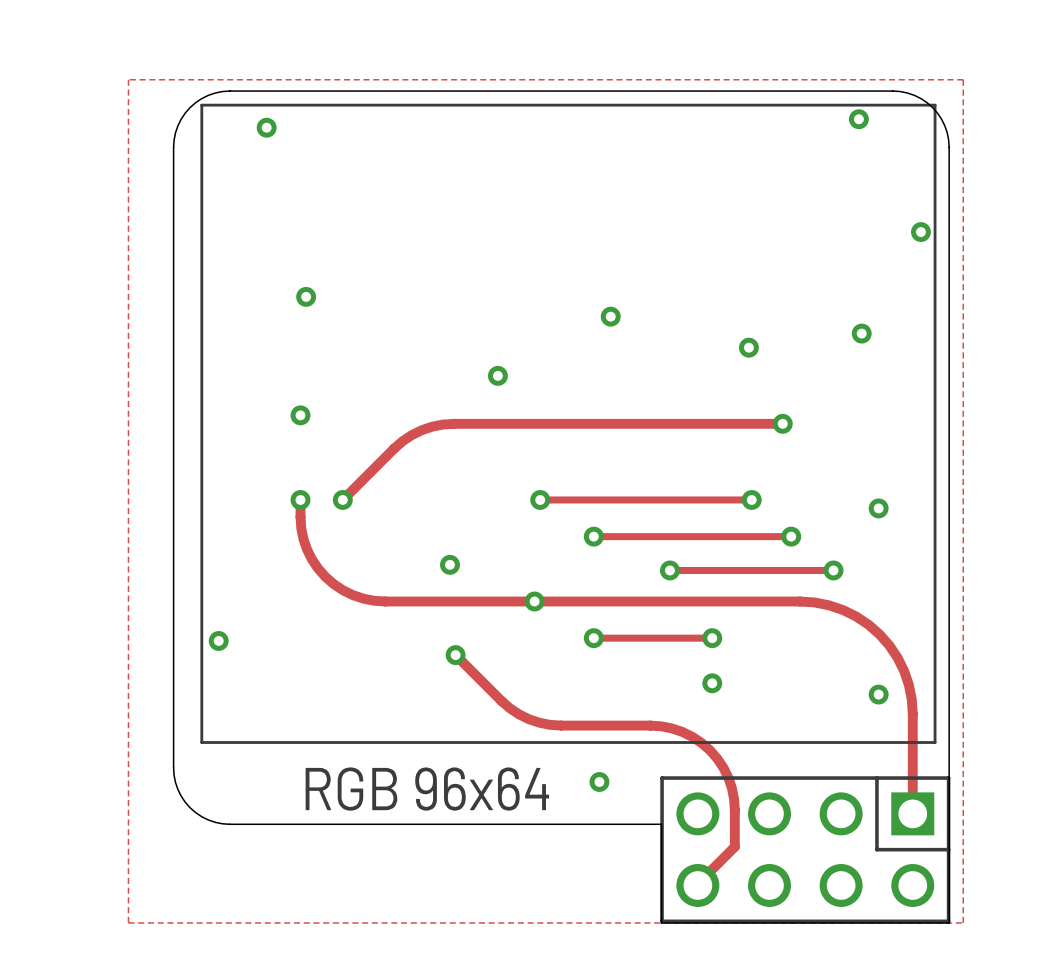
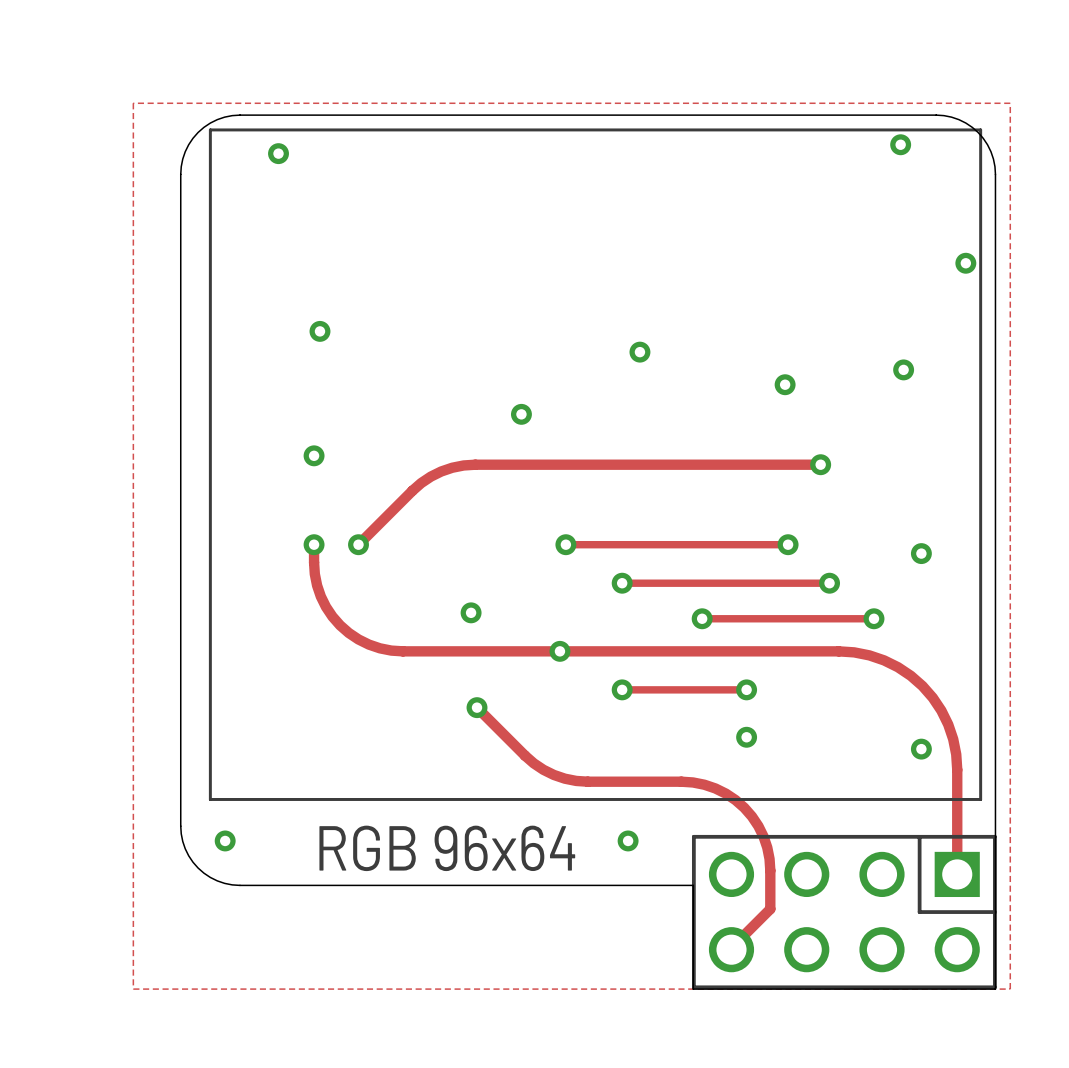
via position: (218, 640) -> (225, 840)

